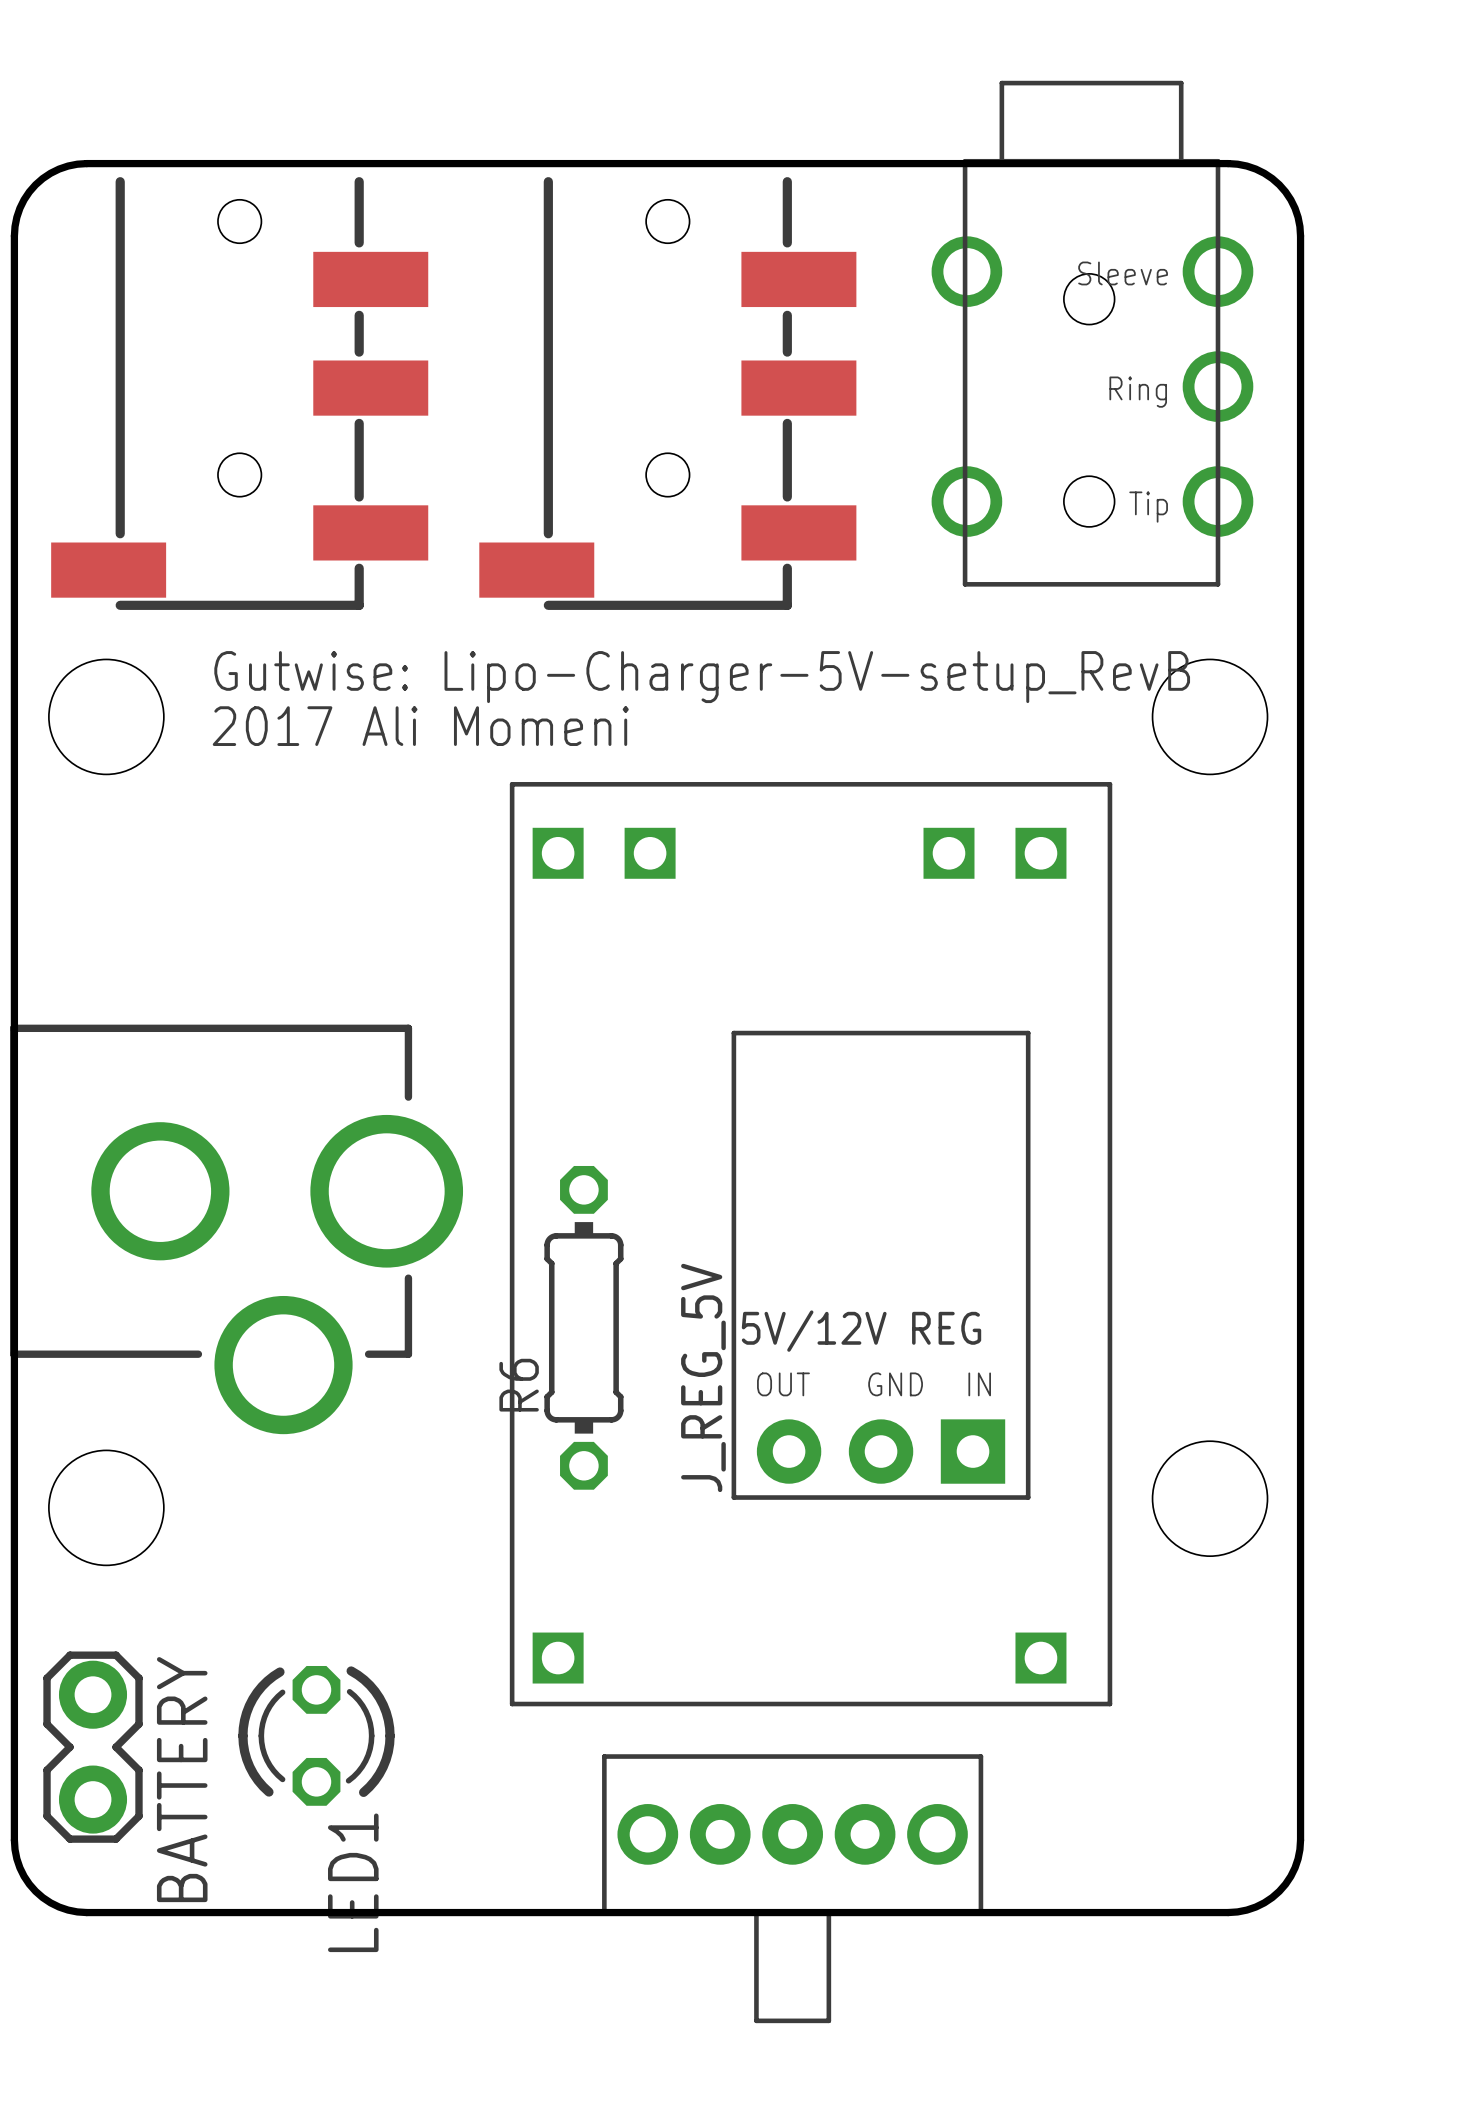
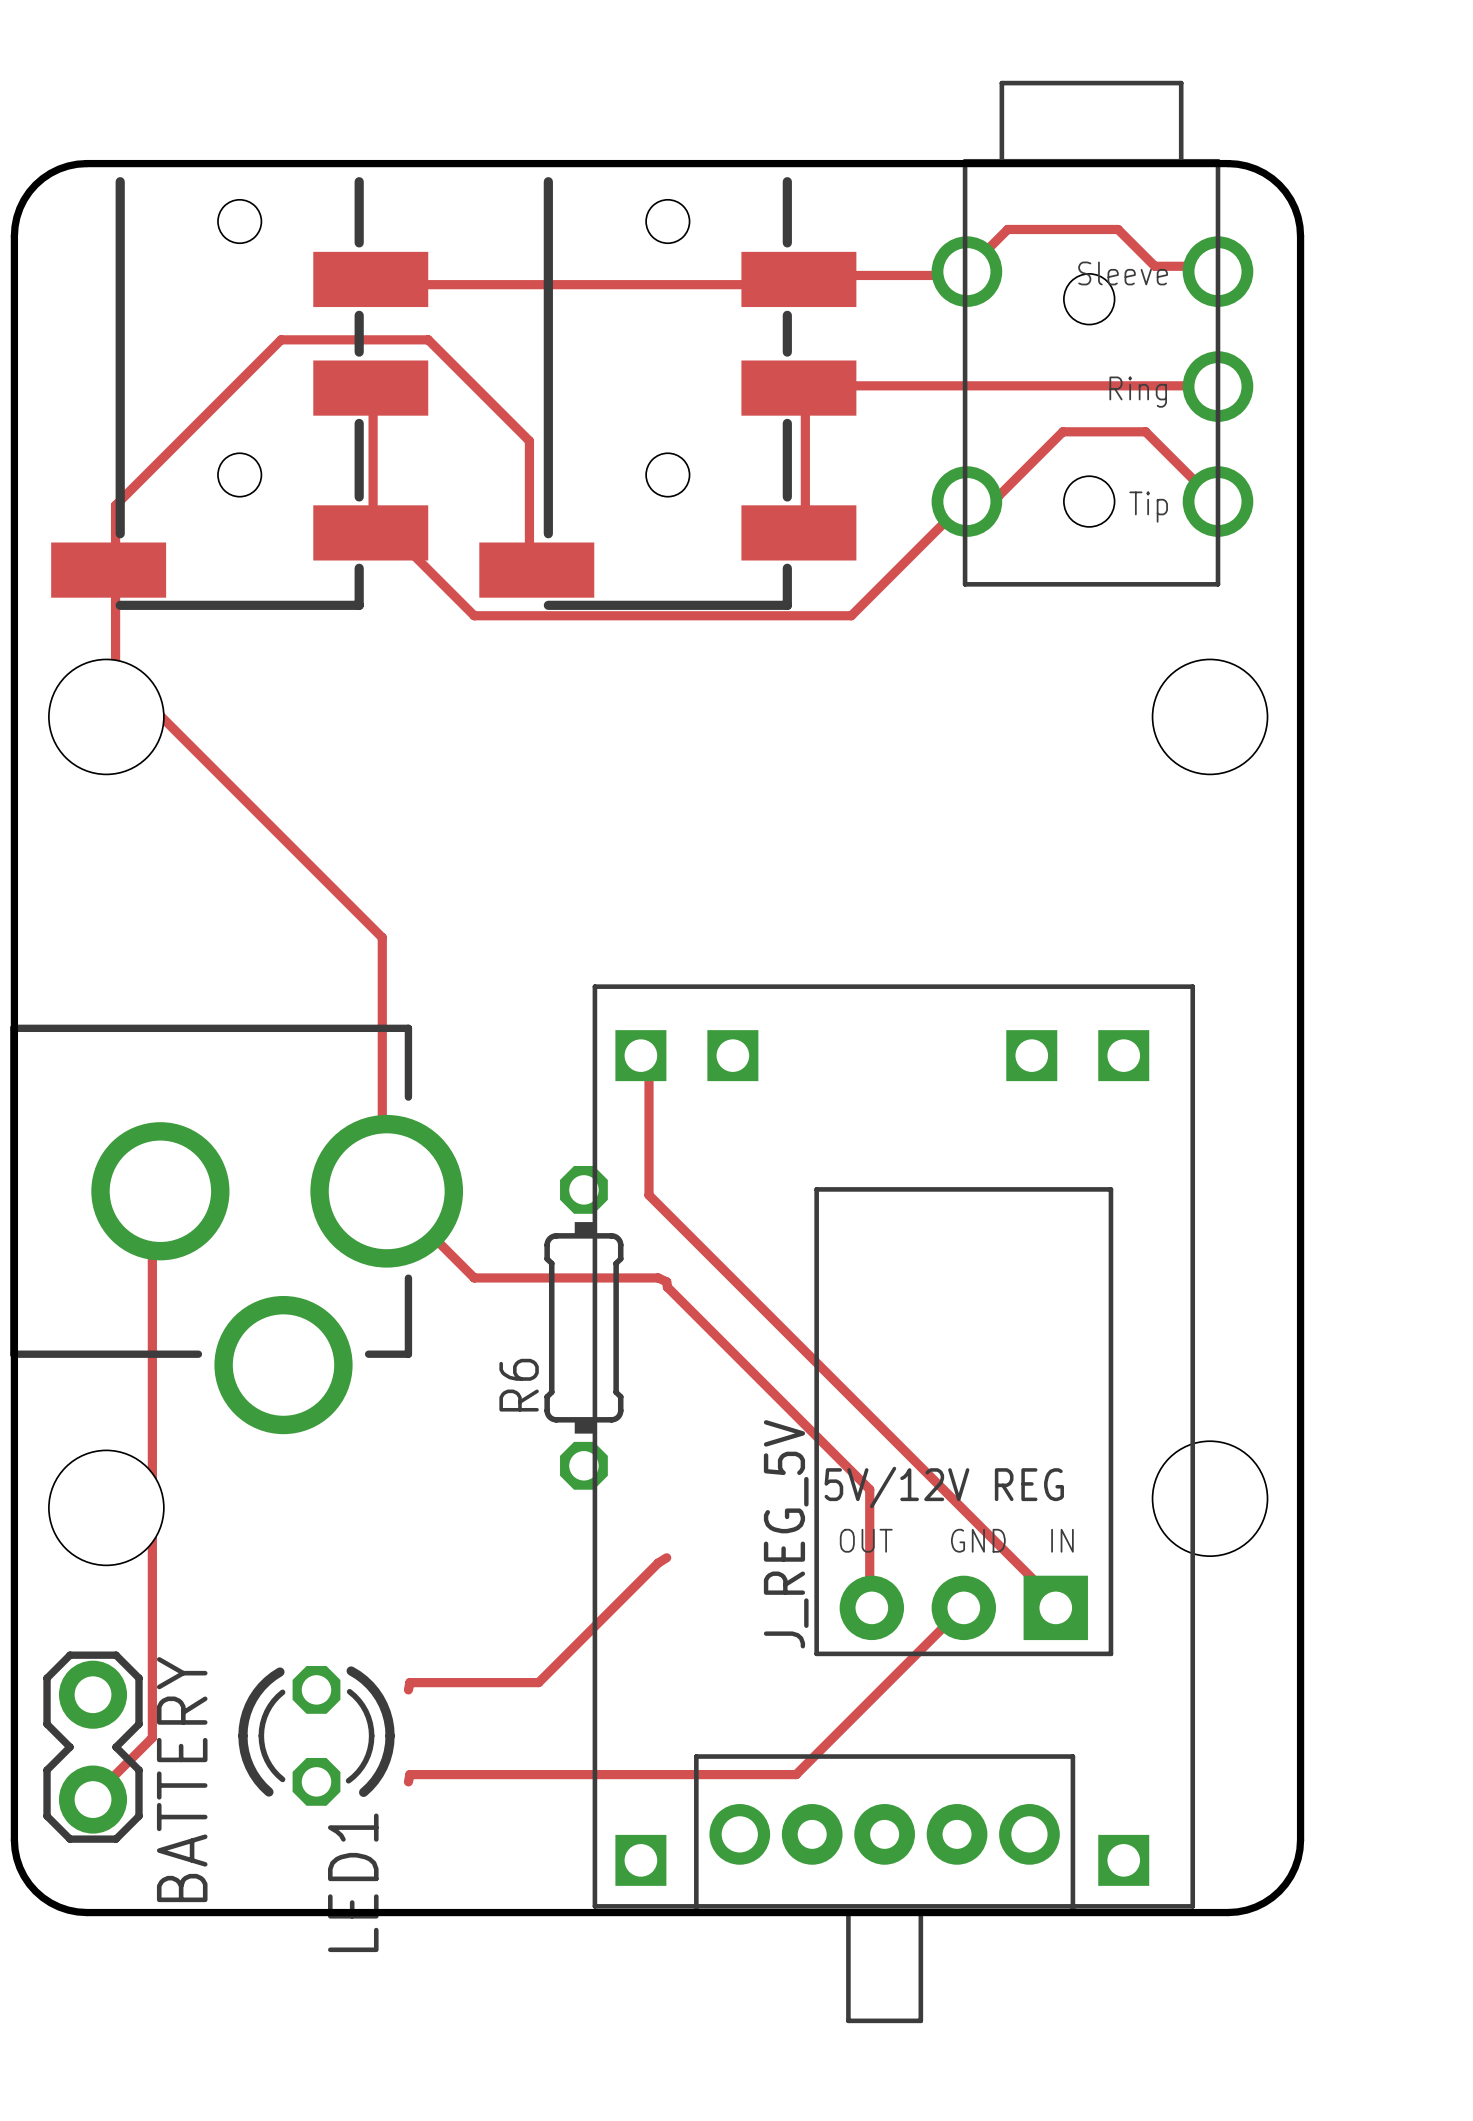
track: none -> (1217, 271) (1210, 266) (1154, 266) (1118, 229) (1007, 229) (961, 275) (805, 275) (798, 279) (796, 284) (373, 284) (370, 279)
track: none -> (1217, 386) (805, 385) (798, 388) (805, 395) (805, 523) (798, 532)
track: none -> (370, 388) (373, 395) (373, 523) (370, 532) (391, 532) (474, 615) (851, 615) (970, 496) (998, 496) (1062, 431) (1145, 431) (1210, 496) (1217, 501)
track: none -> (536, 570) (529, 569) (529, 441) (428, 339) (281, 339) (115, 505) (115, 569) (108, 570) (115, 578) (115, 670) (382, 937) (382, 1185) (474, 1277) (658, 1277) (666, 1281) (667, 1287) (869, 1489) (869, 1599) (871, 1607)
text: Gutwise: Lipo-Charger-5V-setup_RevB (702, 677) -> none
text: 2017 Ali Momeni (420, 726) -> none
track: none -> (640, 1055) (649, 1057) (649, 1195) (1053, 1599) (1055, 1607)
track: none -> (160, 1191) (152, 1195) (152, 1737) (97, 1792) (93, 1799)
part position: (811, 1244) -> (893, 1446)
J_REG_5V position: (881, 1265) -> (963, 1421)
track: none -> (666, 1557) (658, 1563) (538, 1682) (409, 1682) (408, 1689)
track: none -> (963, 1607) (796, 1774) (409, 1774) (408, 1781)
part position: (792, 1888) -> (884, 1888)

